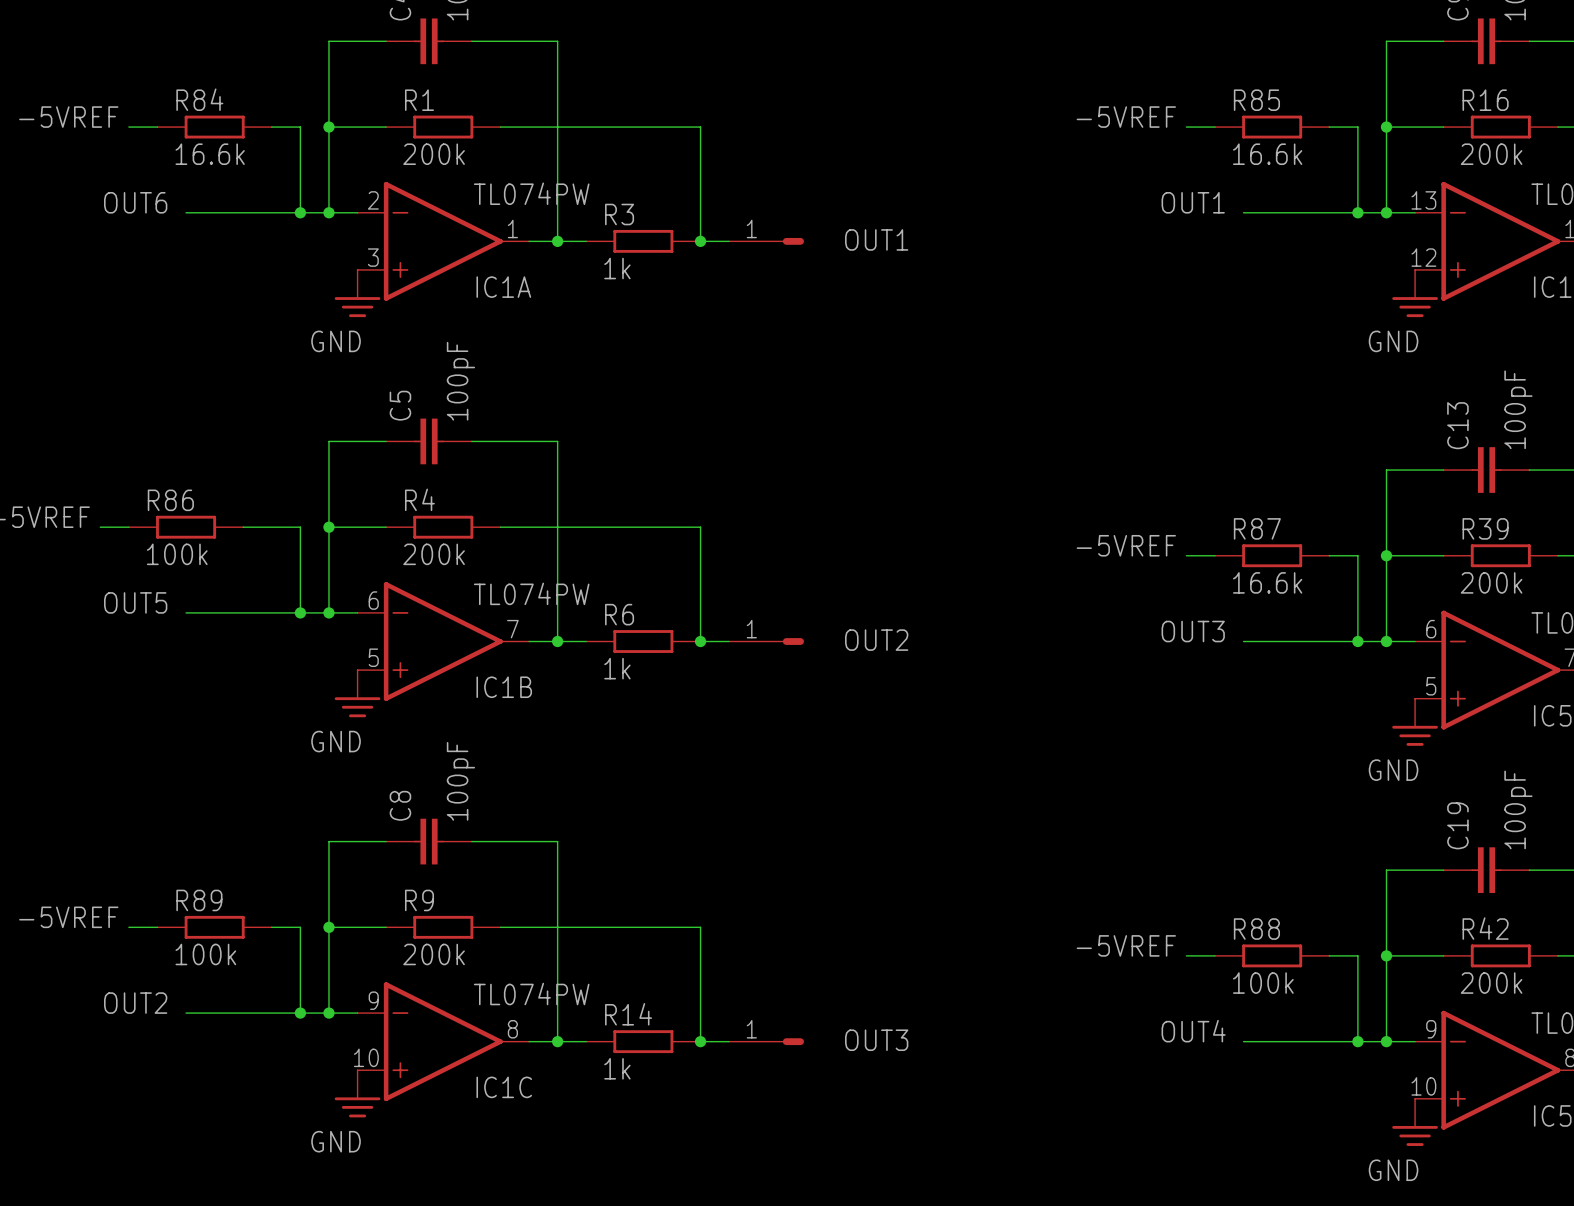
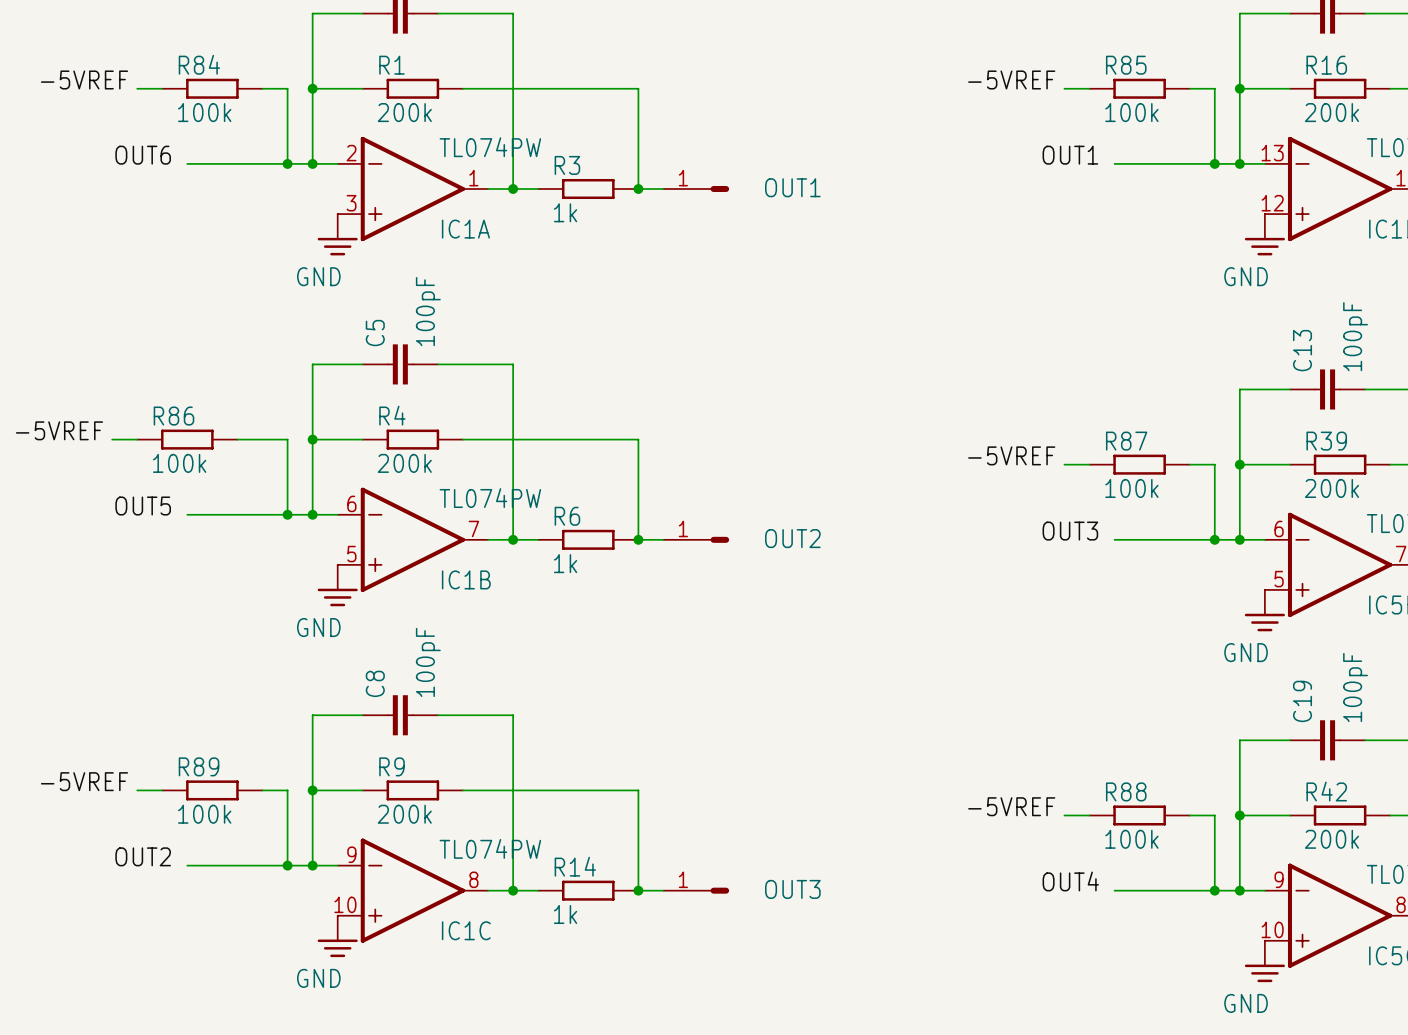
R84 value: 16.6k (210, 154) -> 100k (204, 112)
R85 value: 16.6k (1267, 154) -> 100k (1131, 112)
R87 value: 16.6k (1267, 582) -> 100k (1131, 488)

